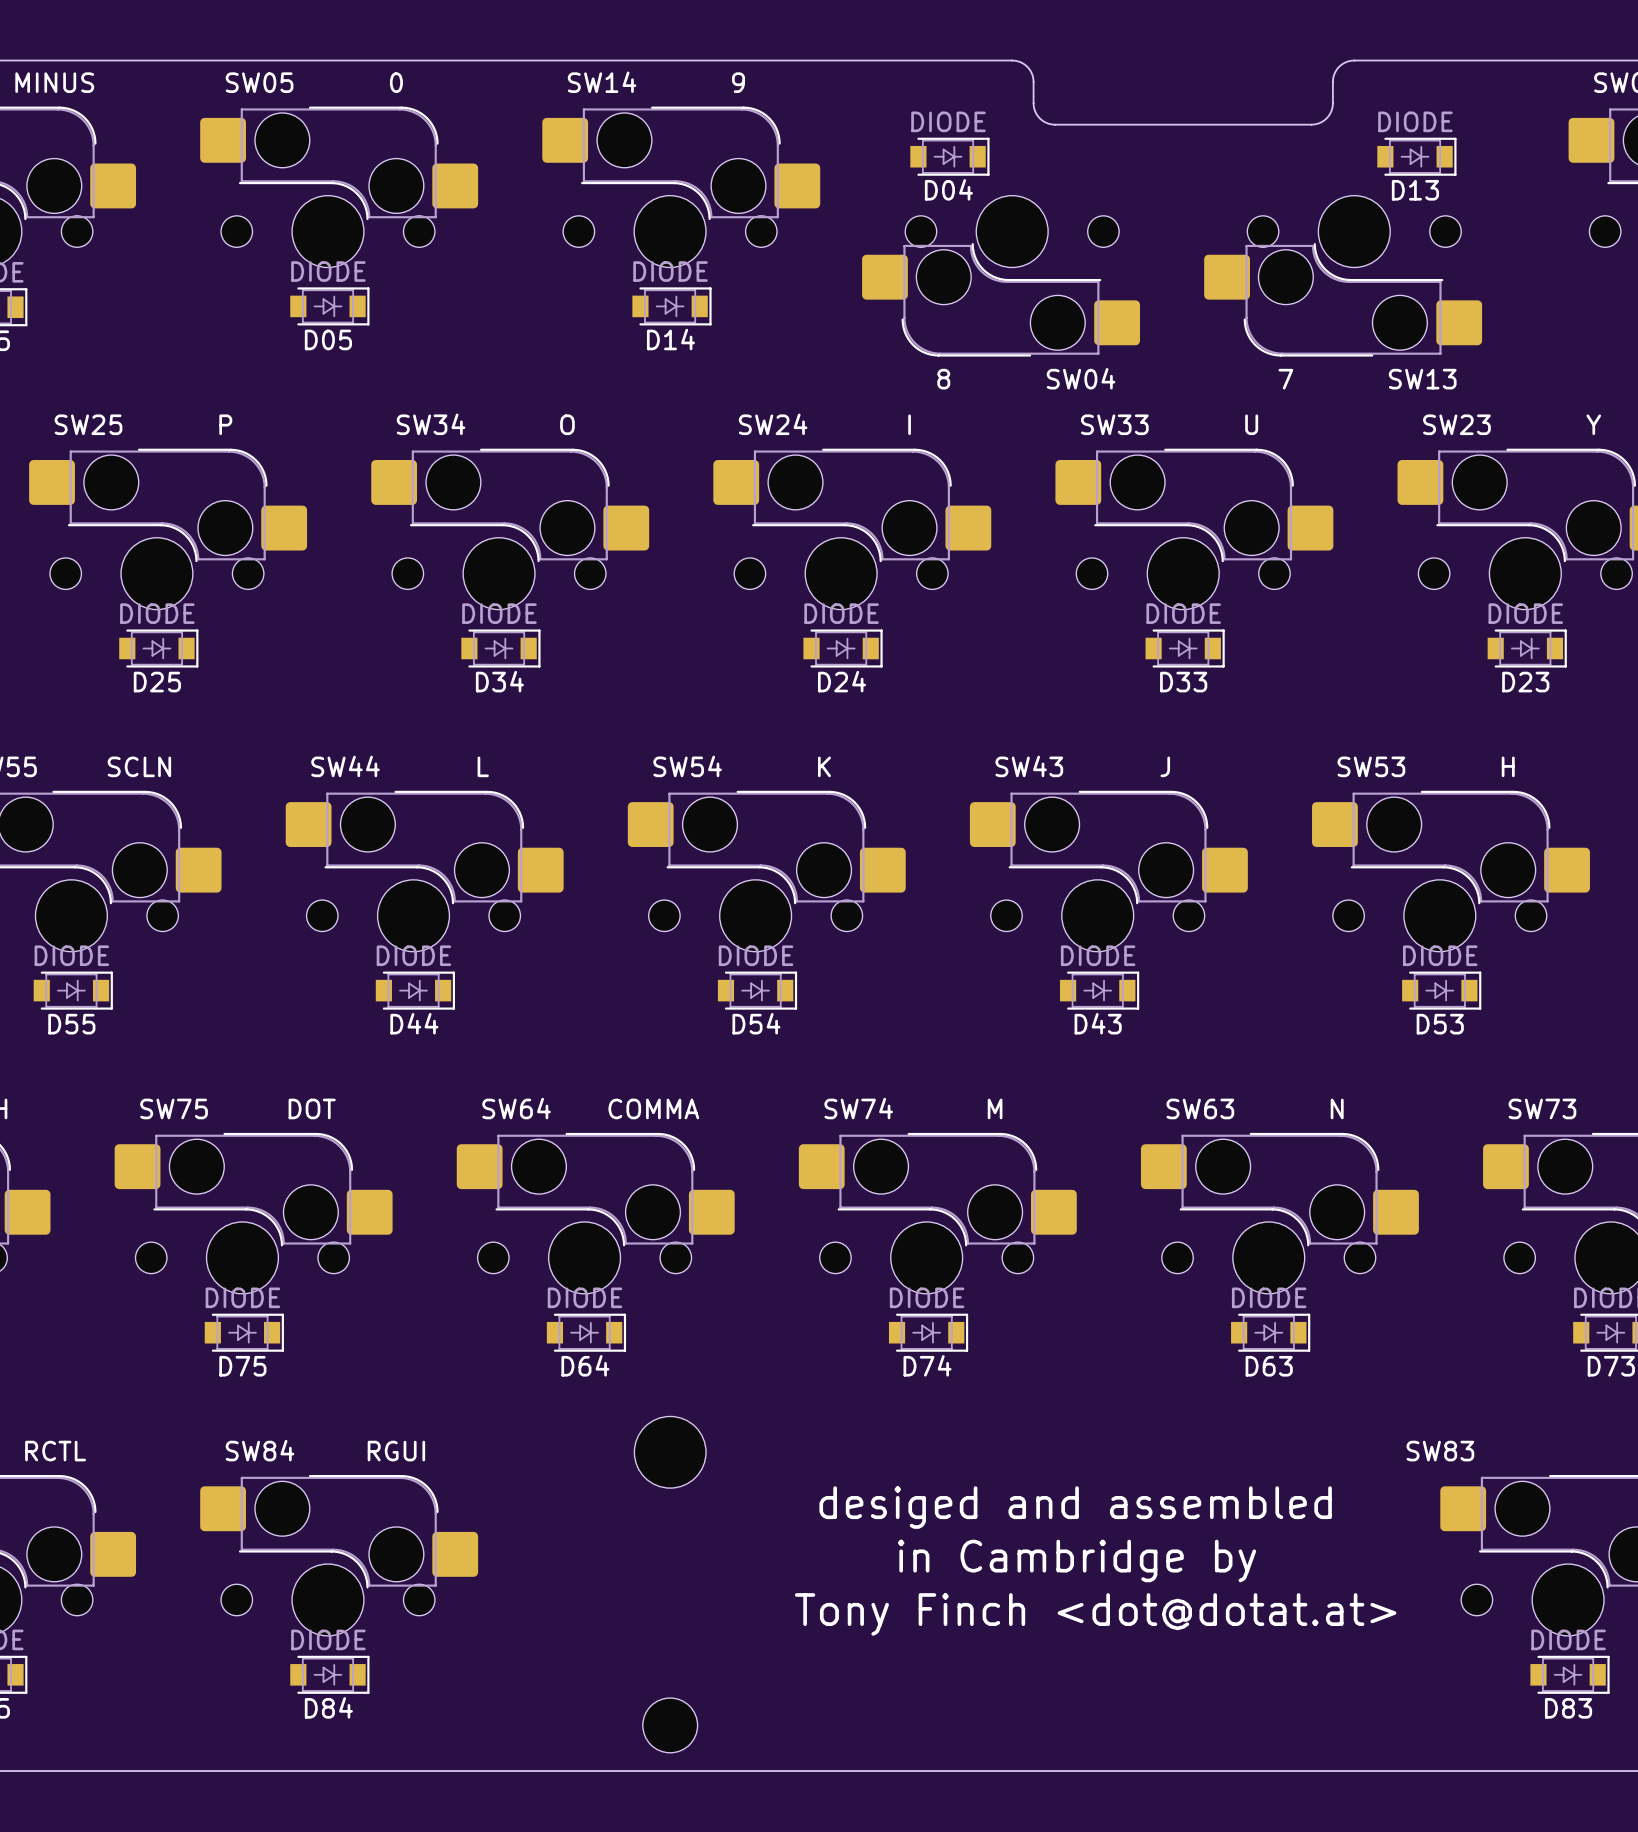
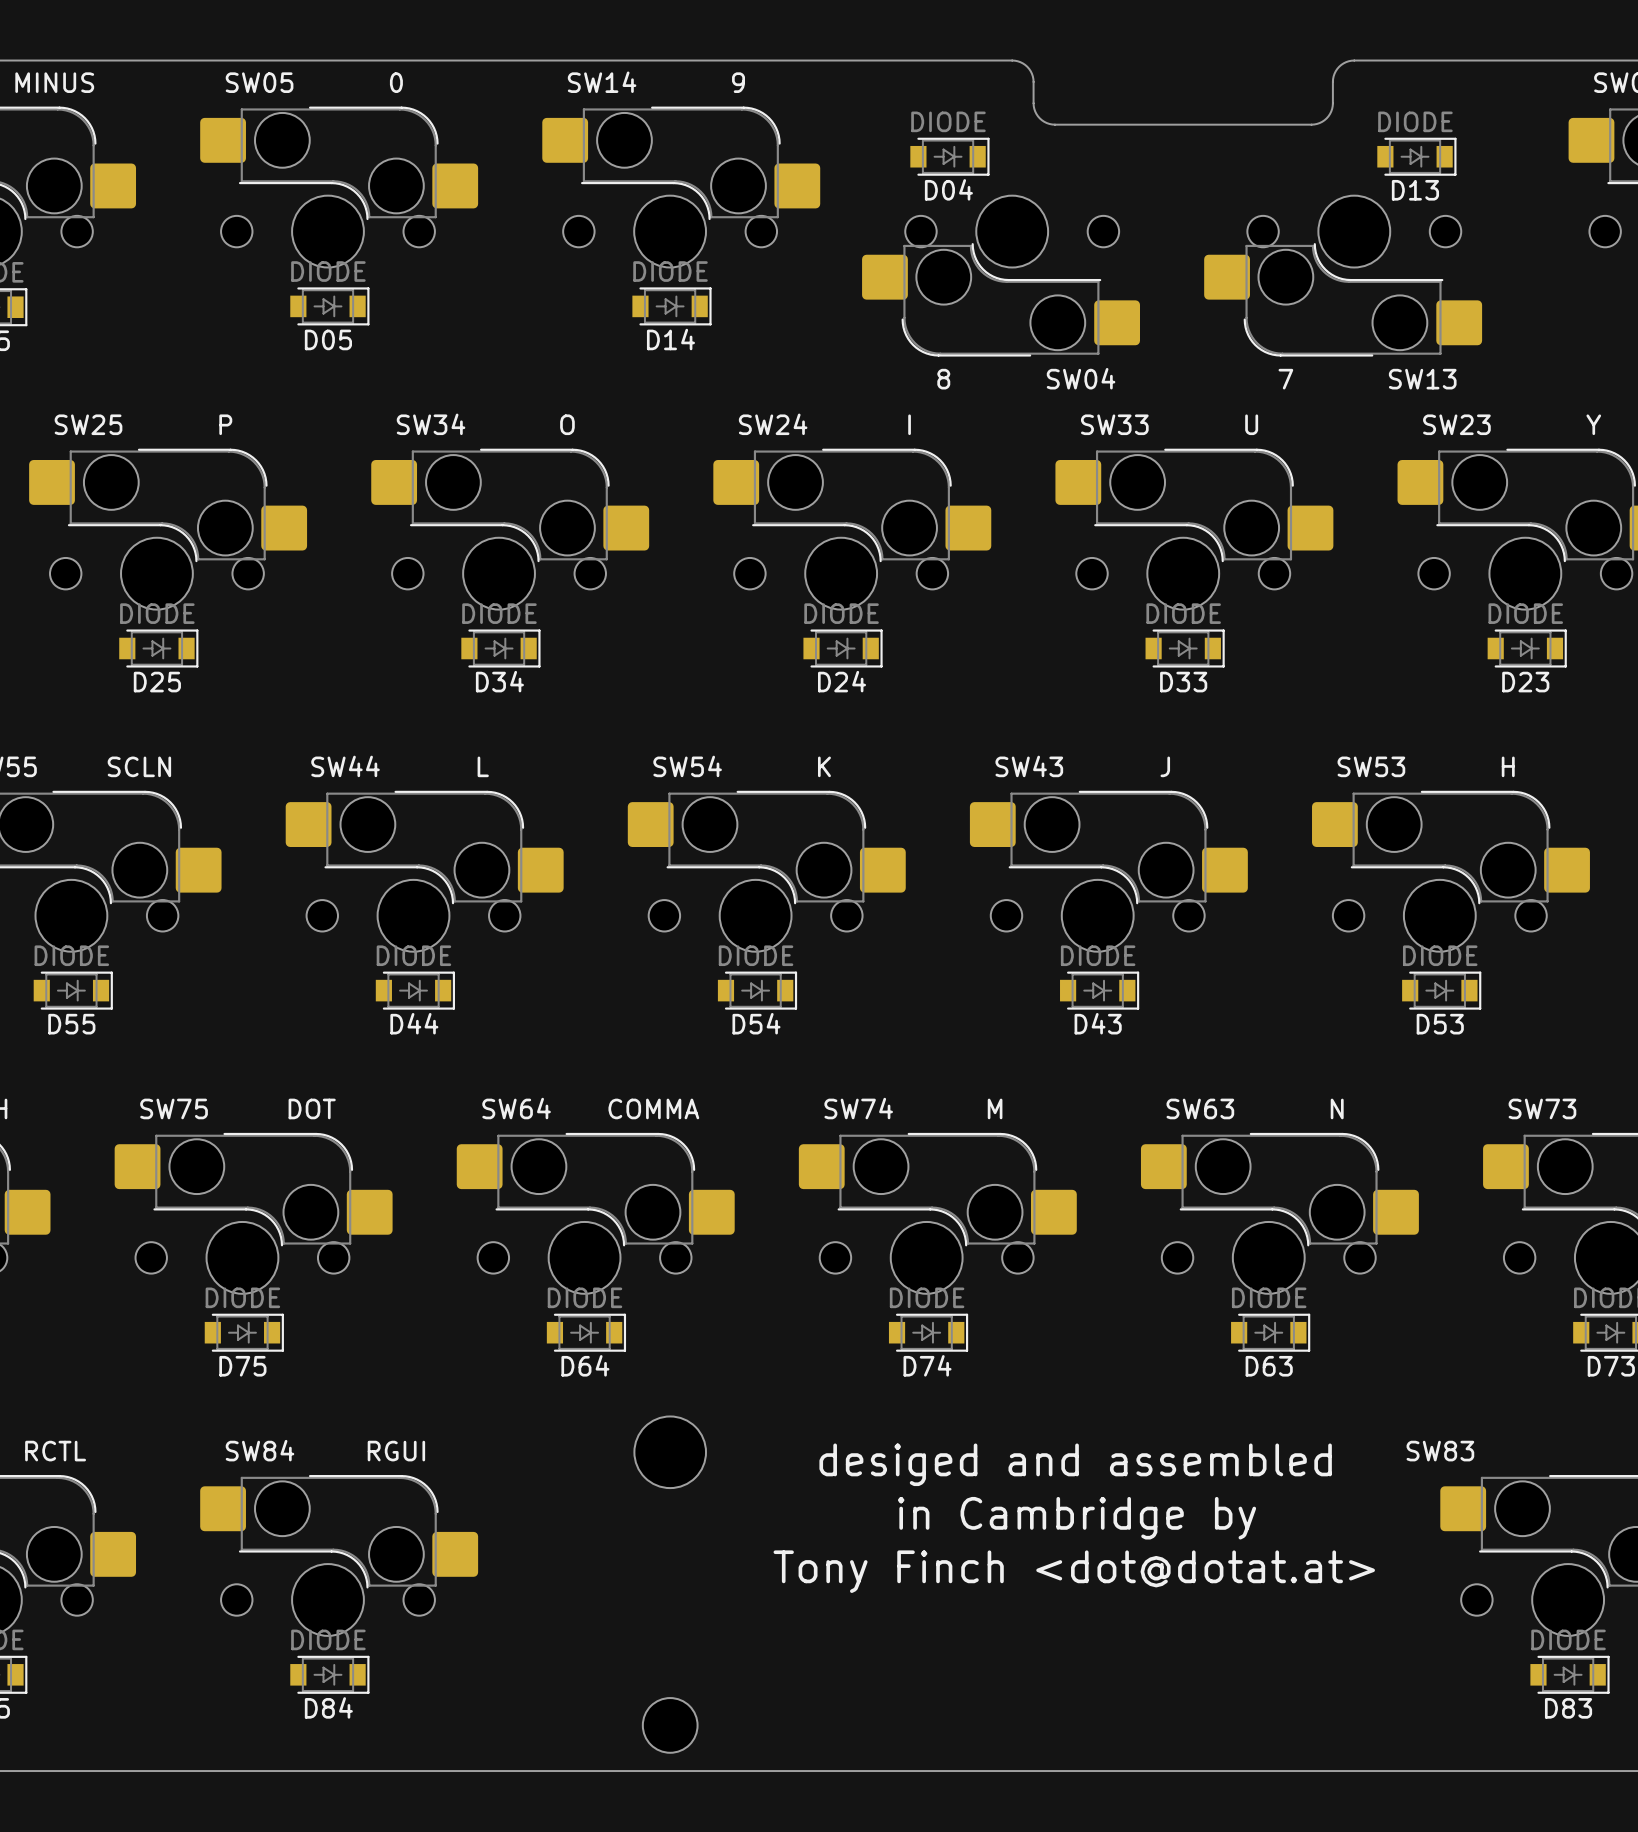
text: none -> desiged and assembled (1075, 1464)
text: desiged and assembled (1075, 1507) -> in Cambridge by (1077, 1518)
text: in Cambridge by (1077, 1560) -> Tony Finch <dot@dotat.at> (1074, 1571)
text: Tony Finch <dot@dotat.at> (1095, 1614) -> none

